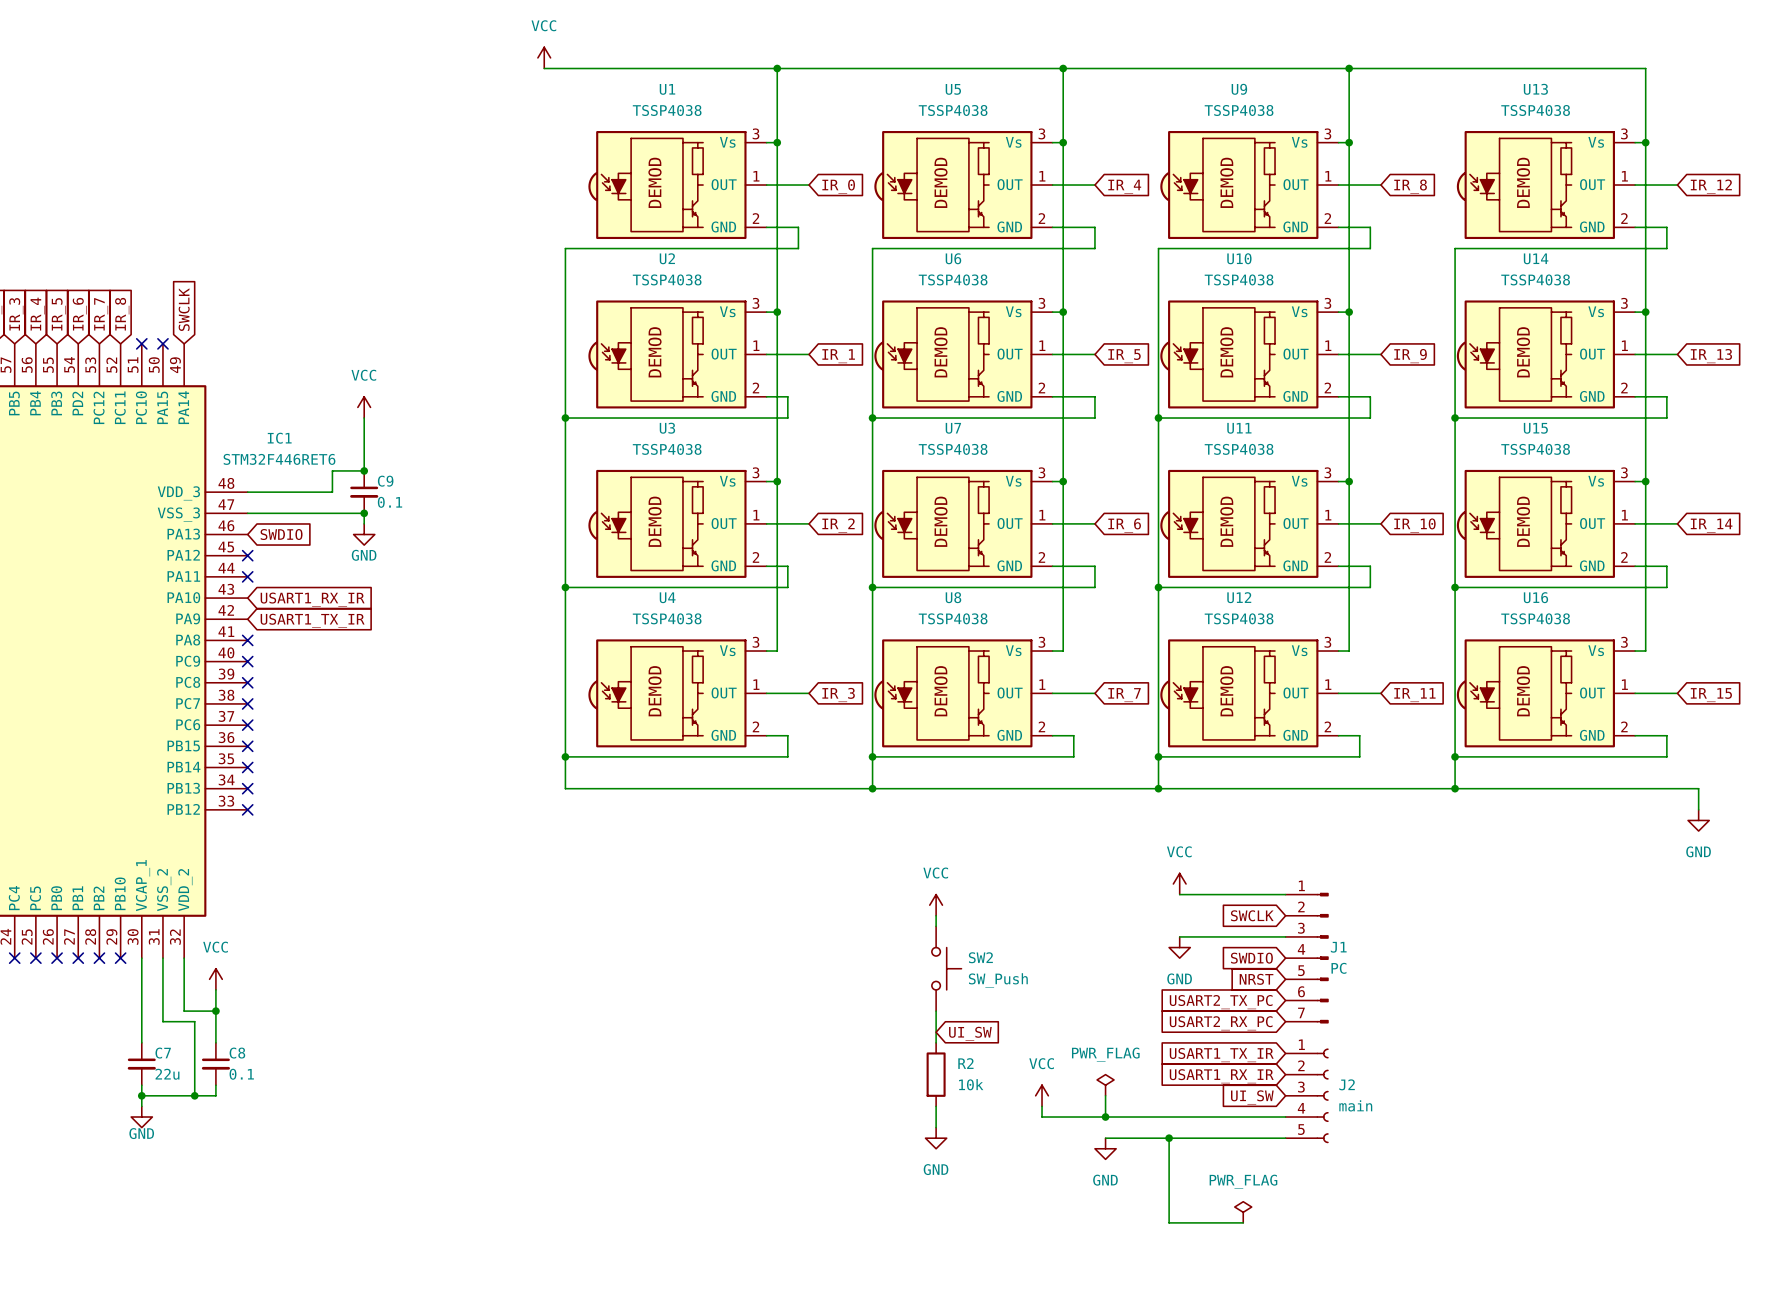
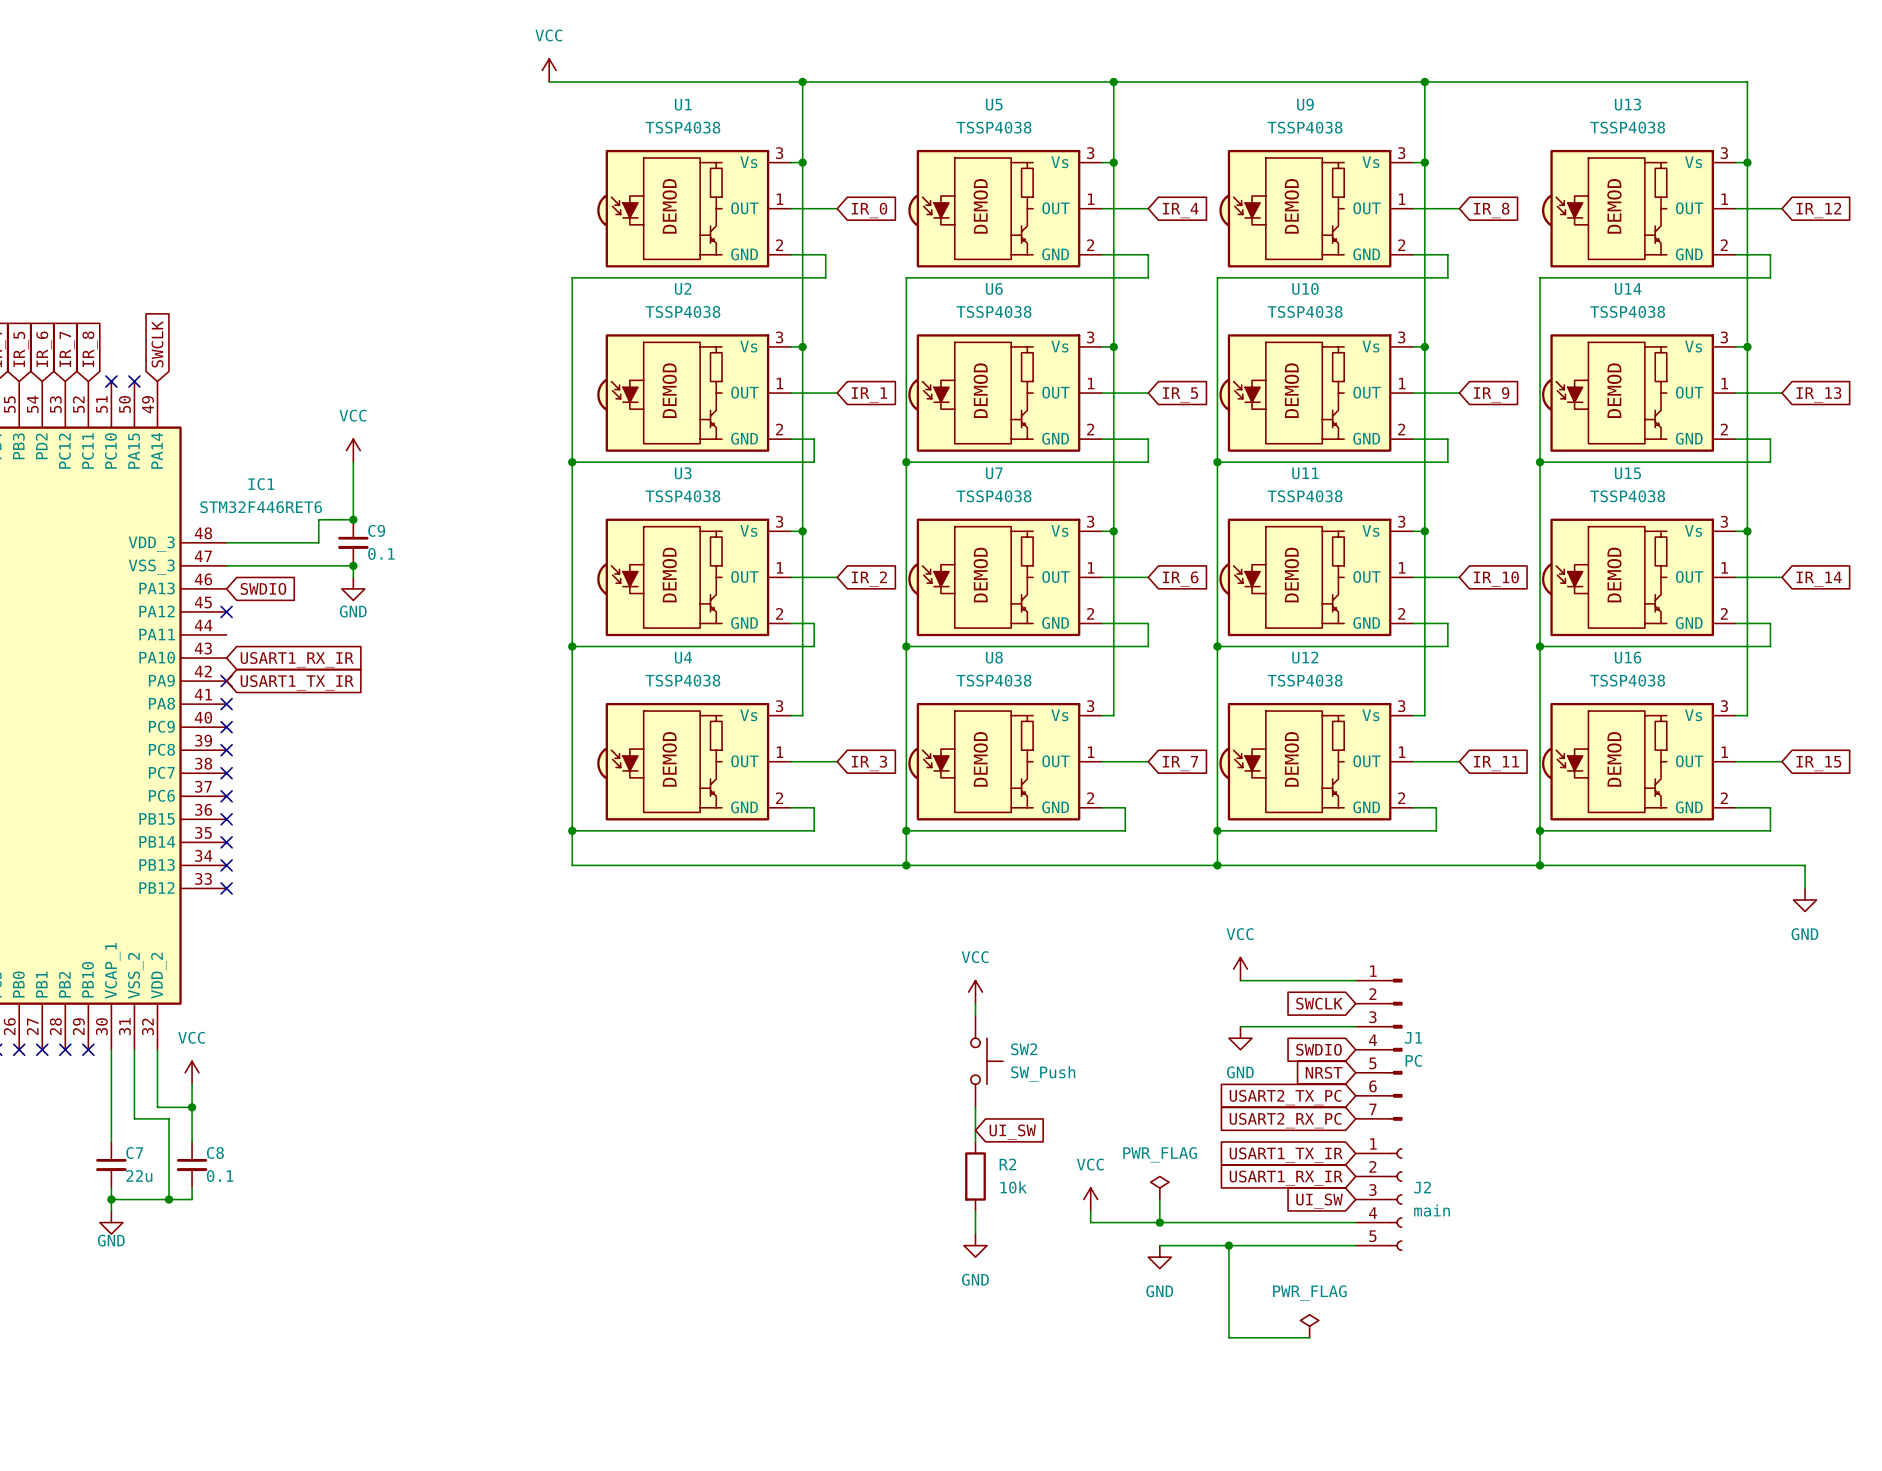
no-connect mark position: (247, 576) -> (226, 681)

